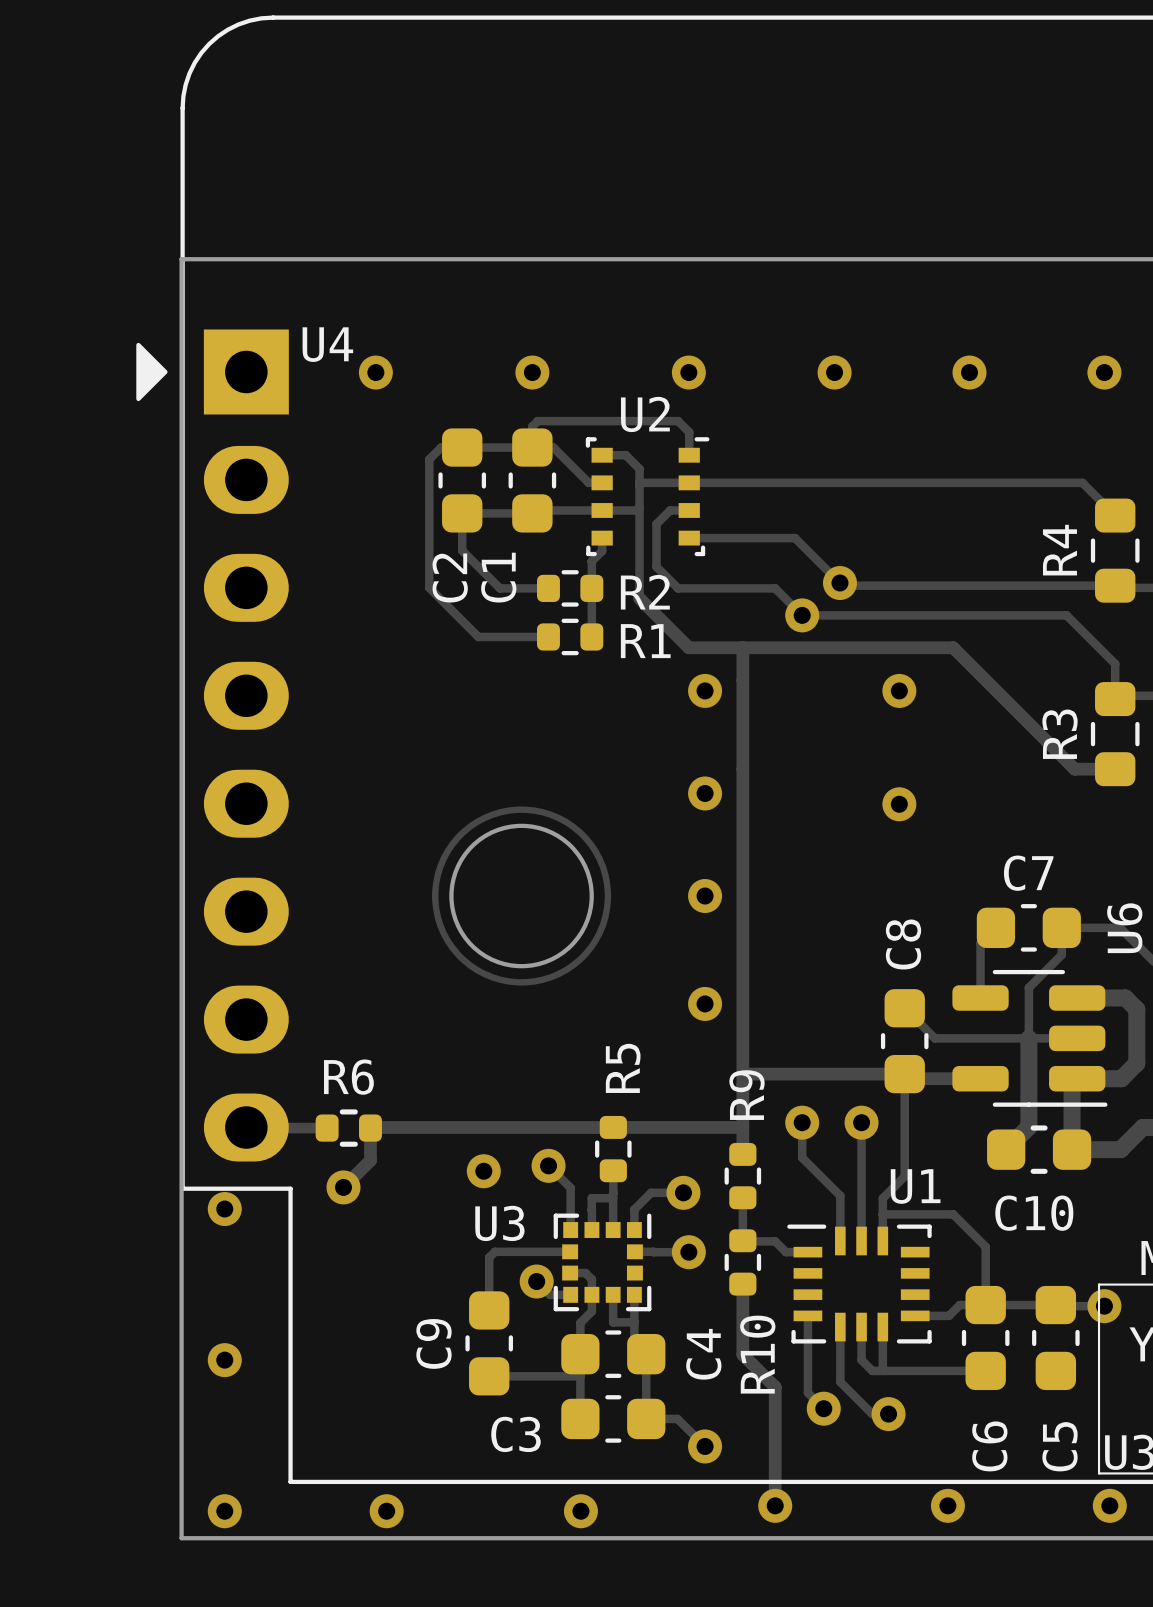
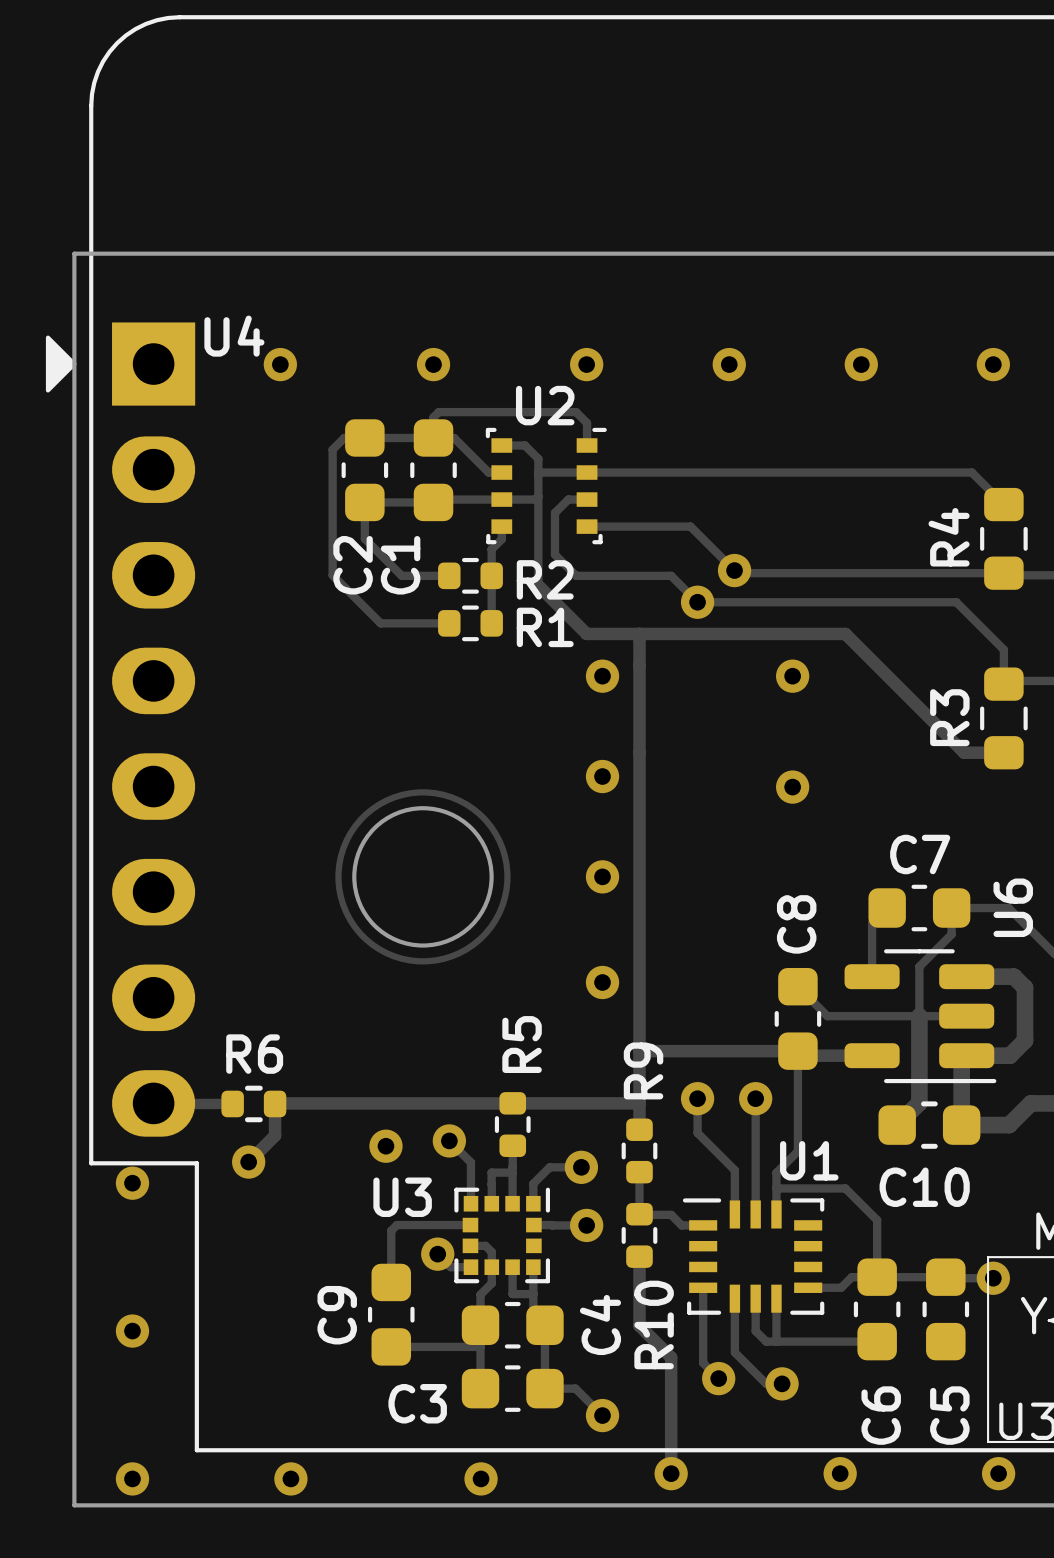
board edge: (181, 259) (181, 1538) -> (90, 253) (74, 253) (74, 1505) (90, 1505)

